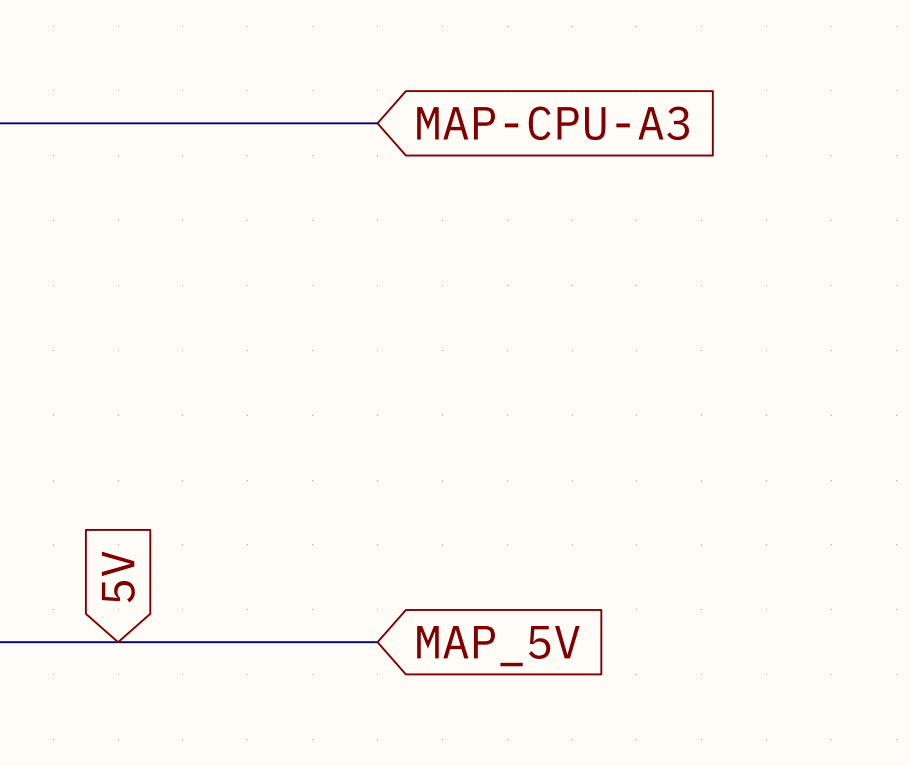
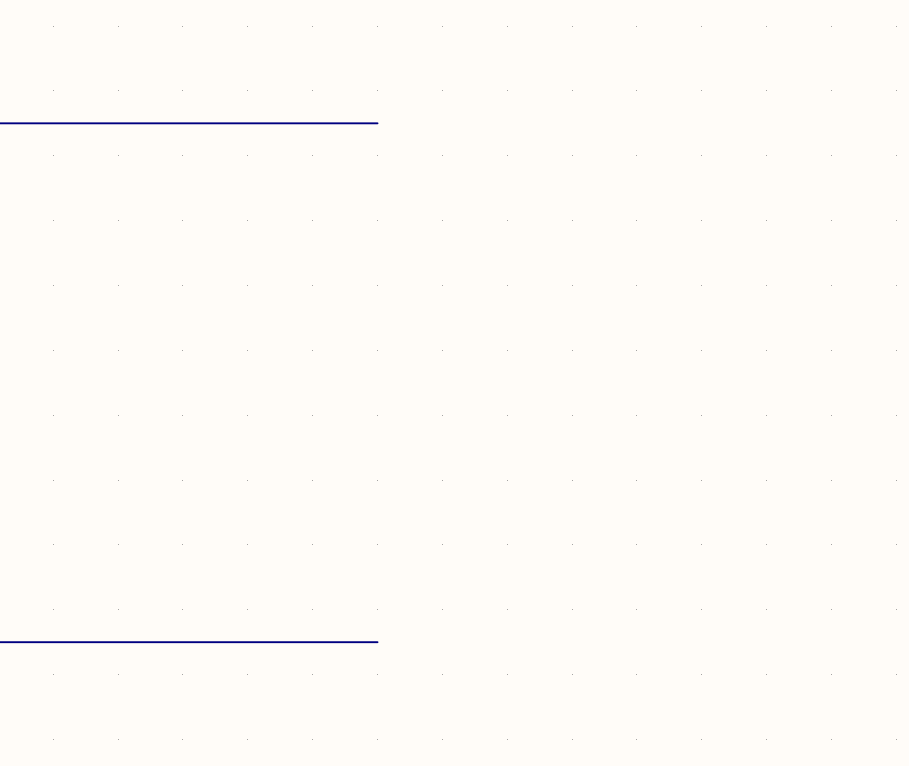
global label: MAP-CPU-A3 (553, 123) -> none
global label: 5V (118, 576) -> none
global label: MAP_5V (498, 646) -> none

